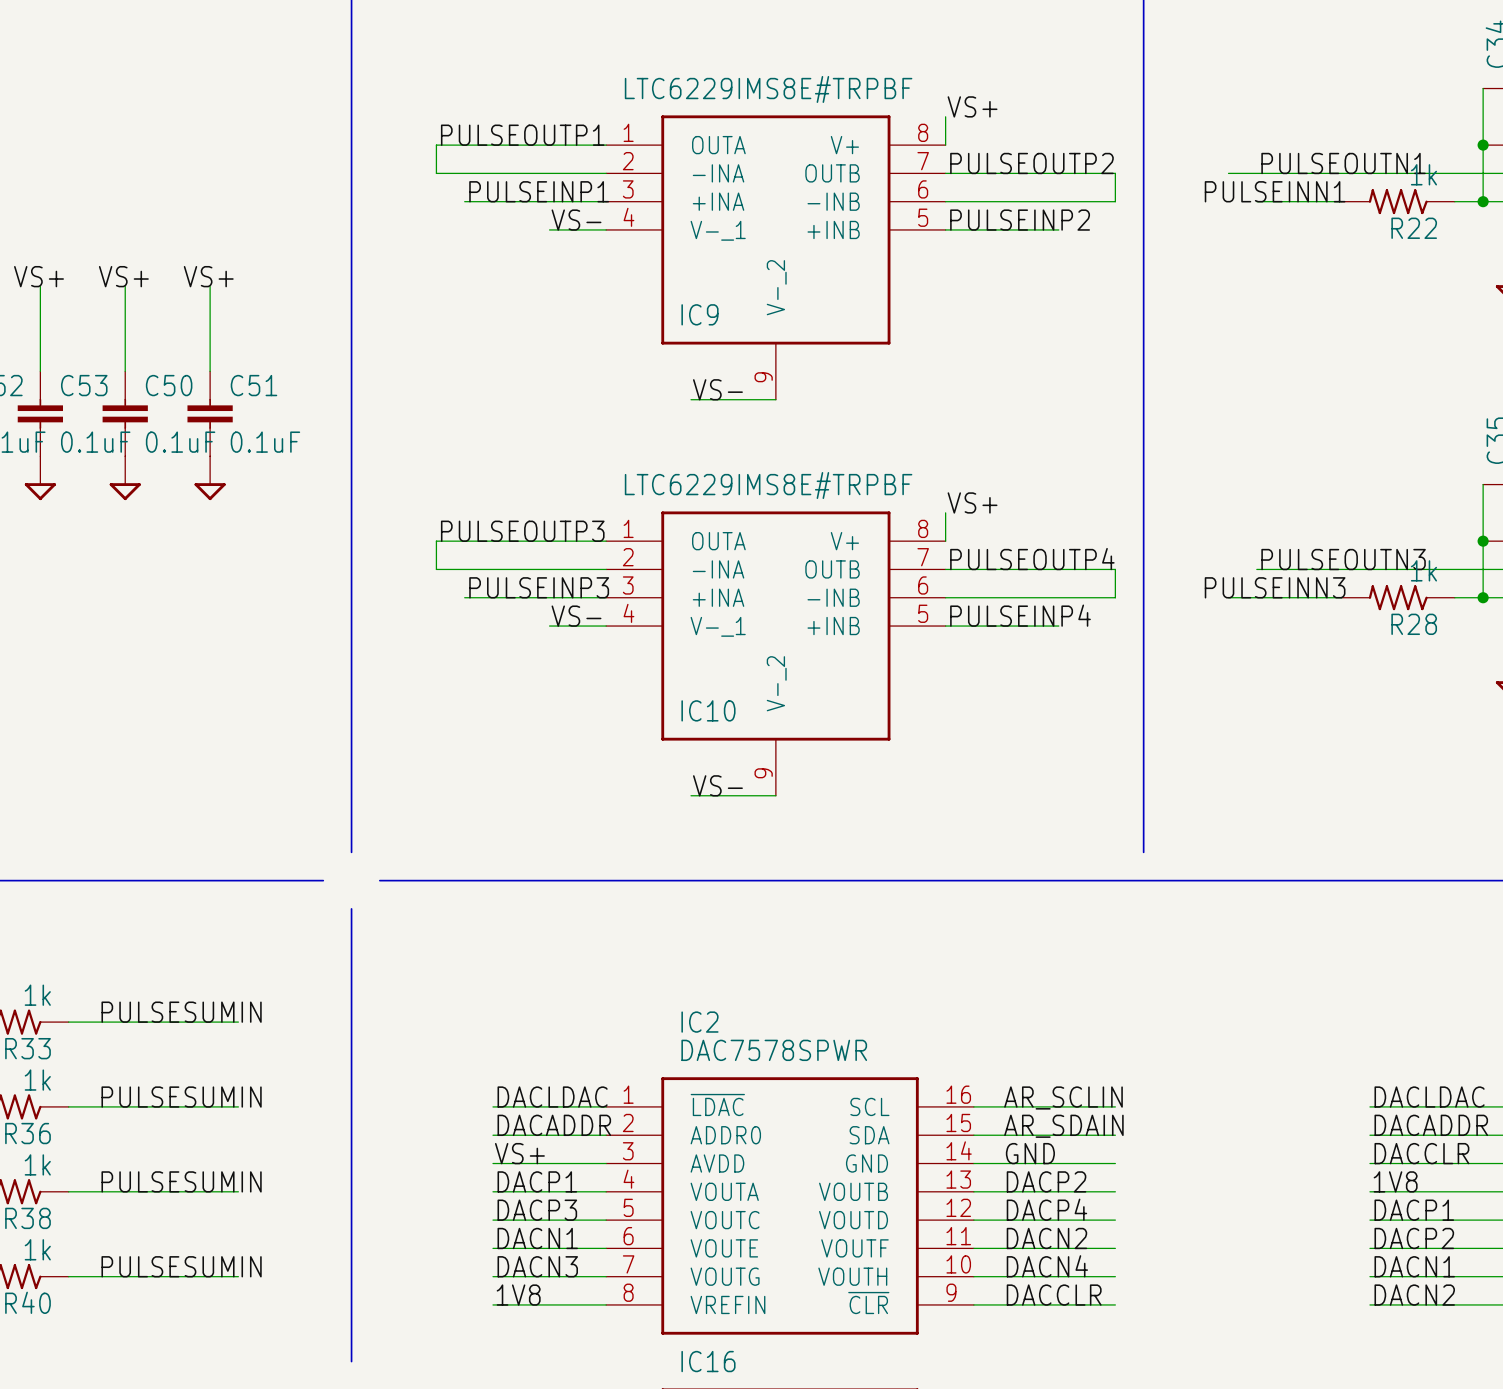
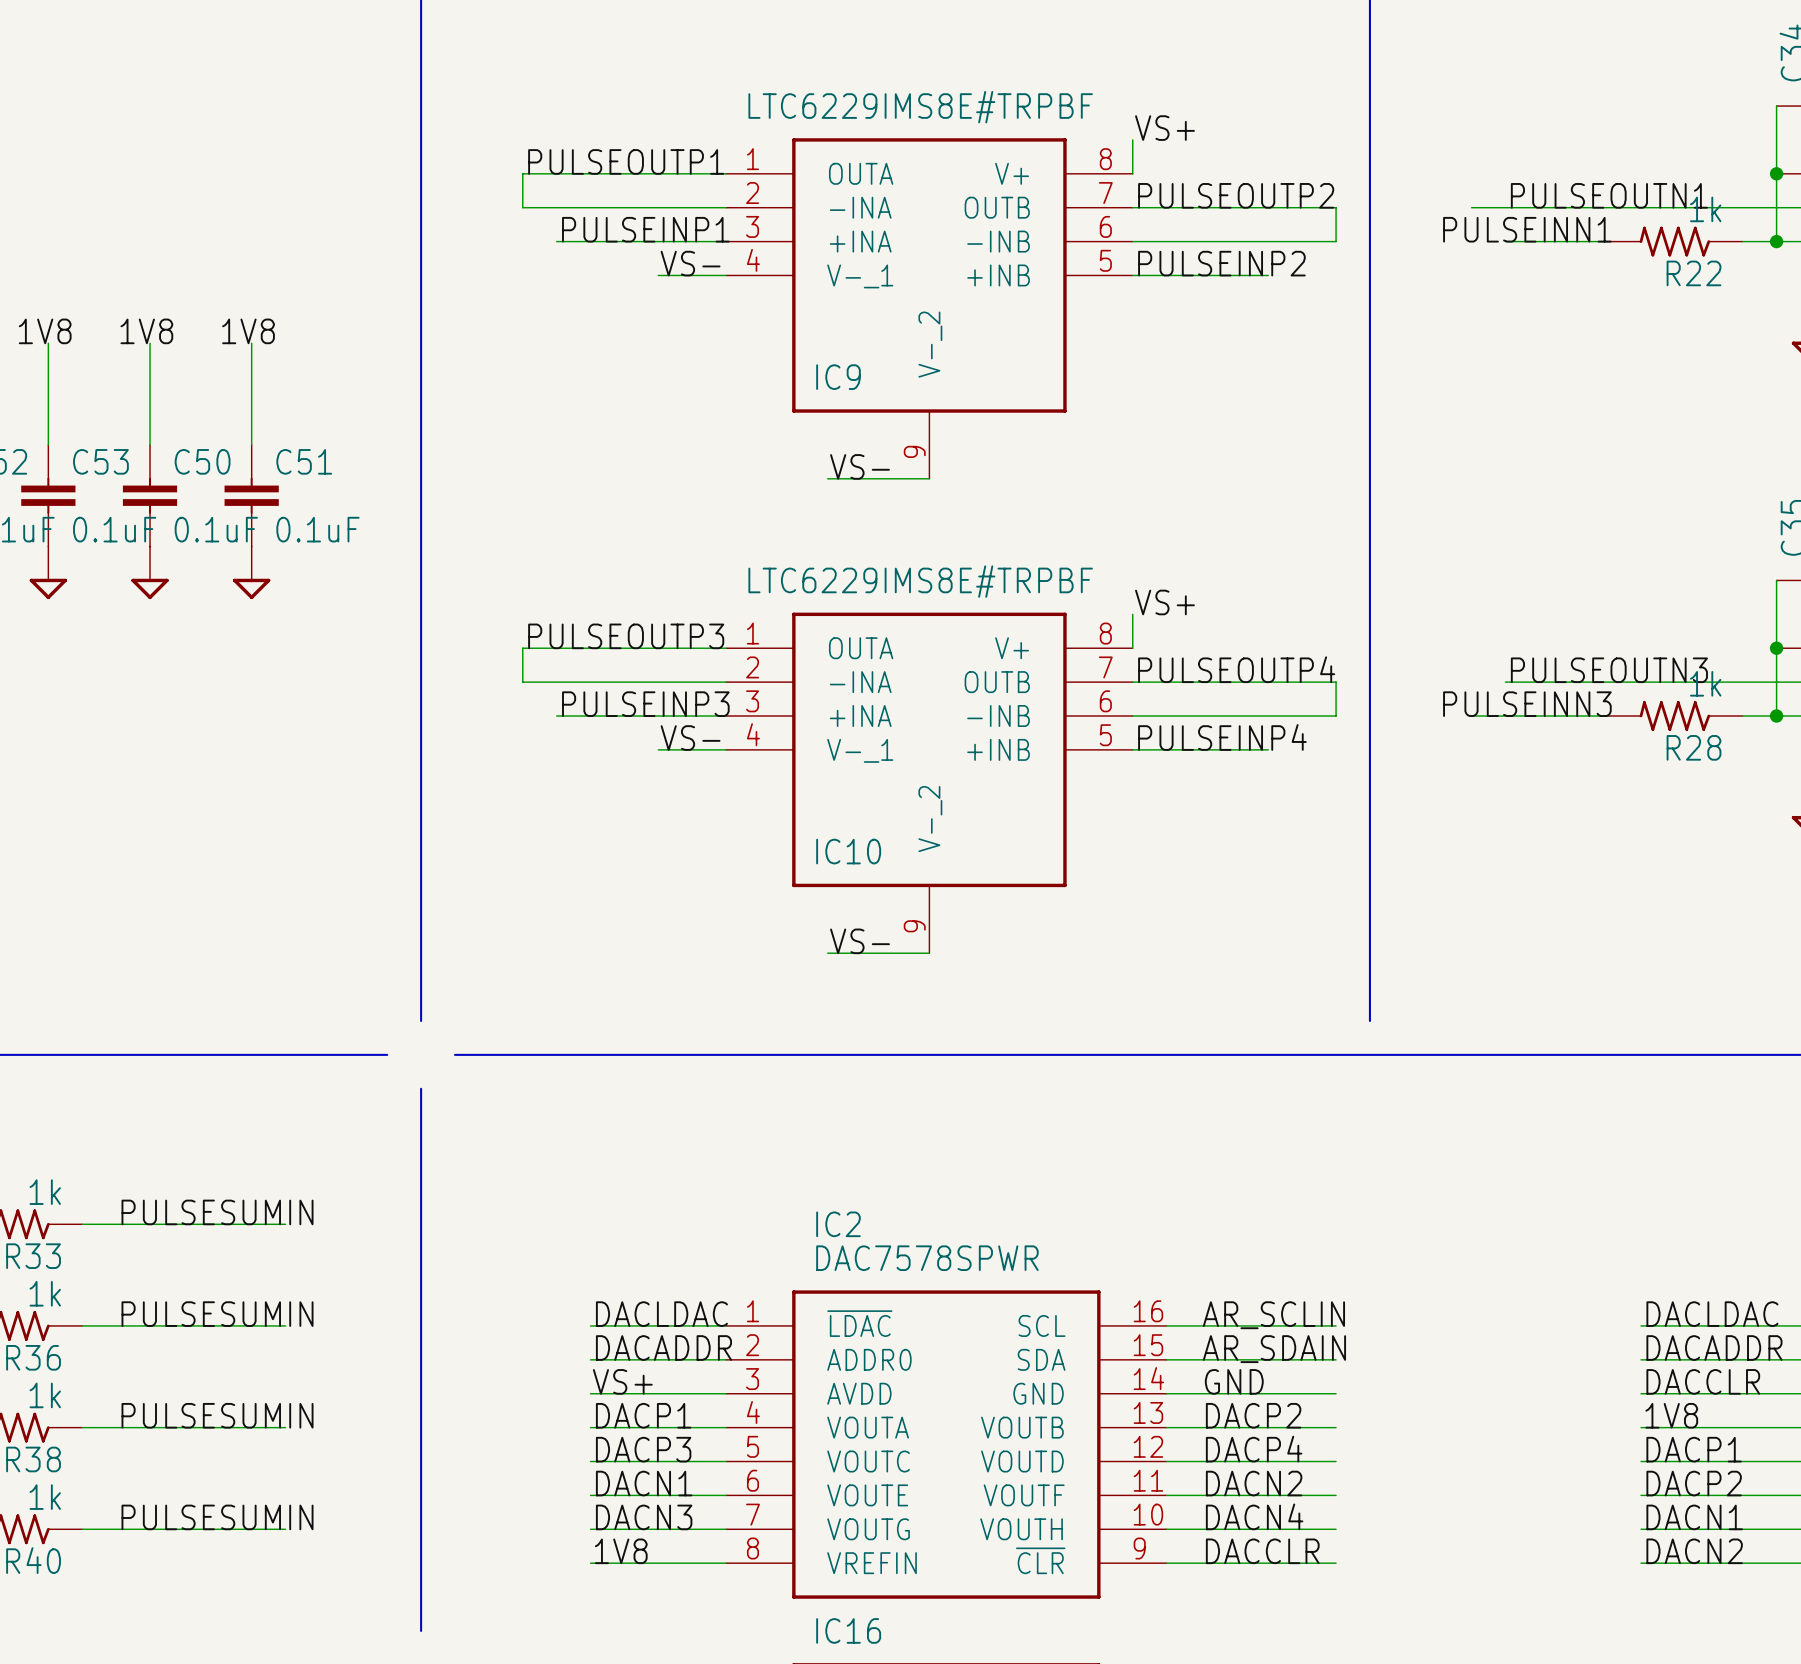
label: VS+ (39, 276) -> 1V8 (45, 331)
label: VS+ (123, 276) -> 1V8 (146, 331)
label: VS+ (208, 276) -> 1V8 (248, 331)

